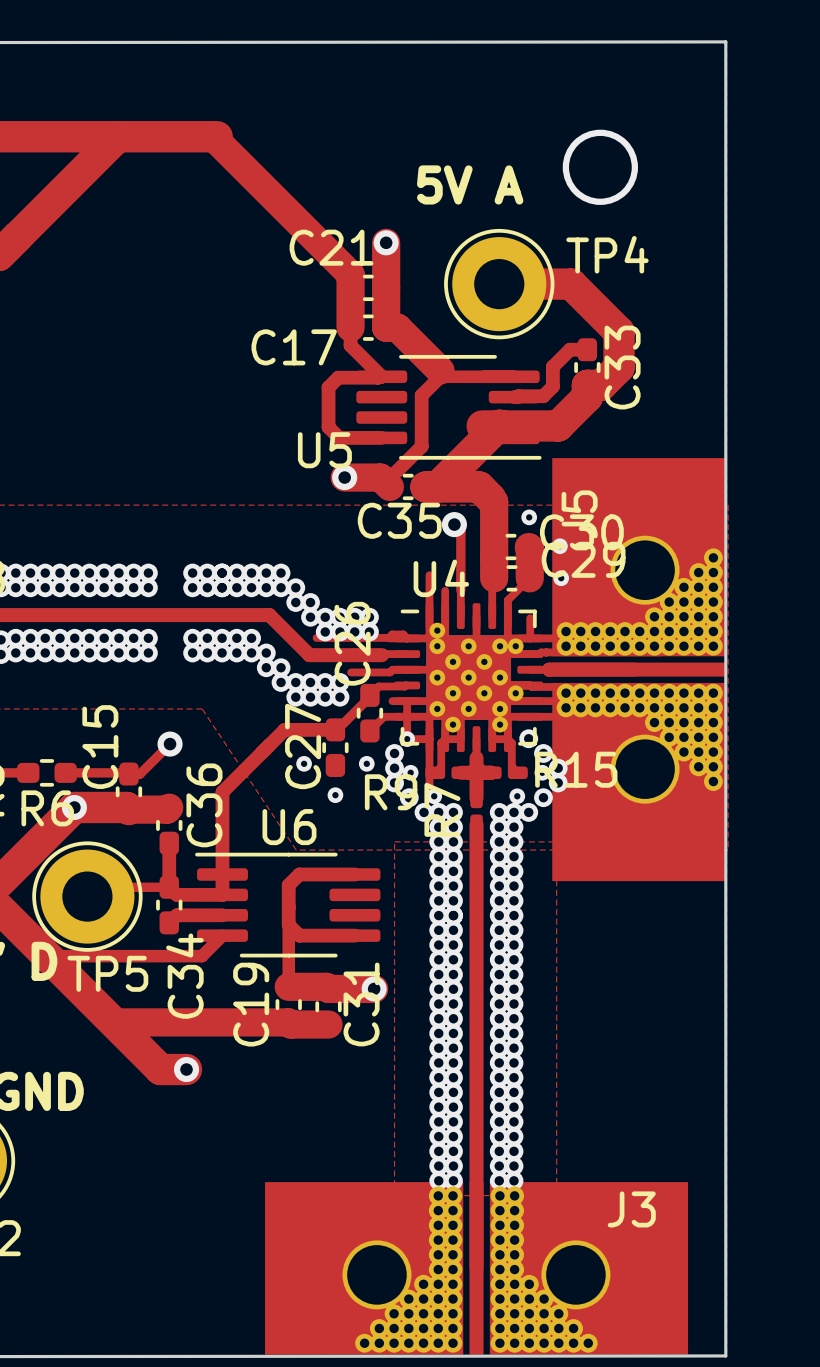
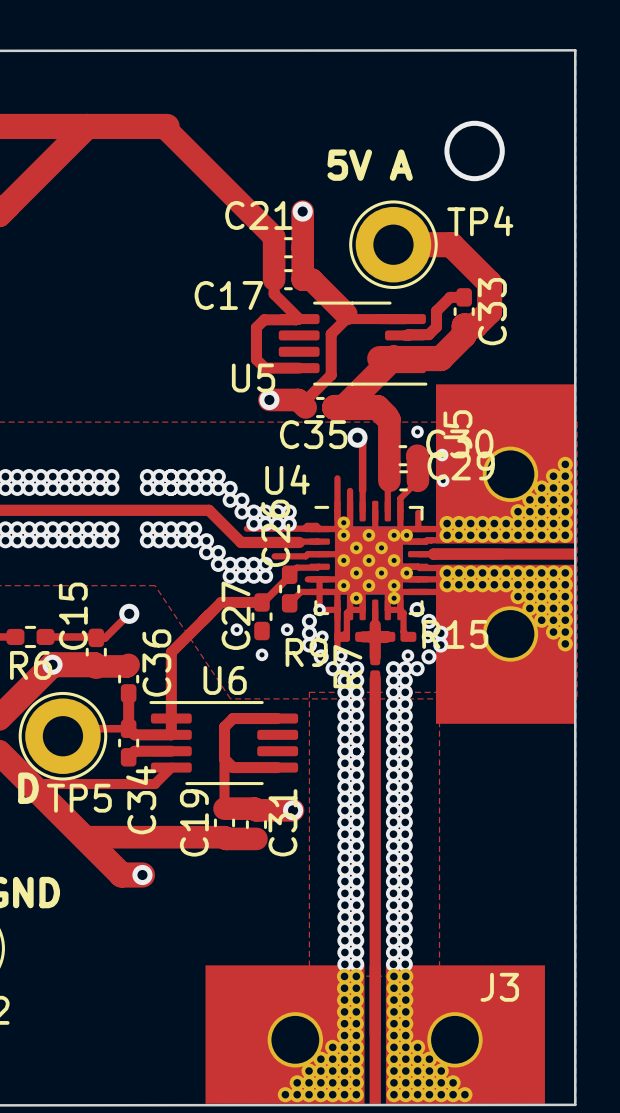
U4 name position: U4 (441, 578) -> U4 (287, 479)

